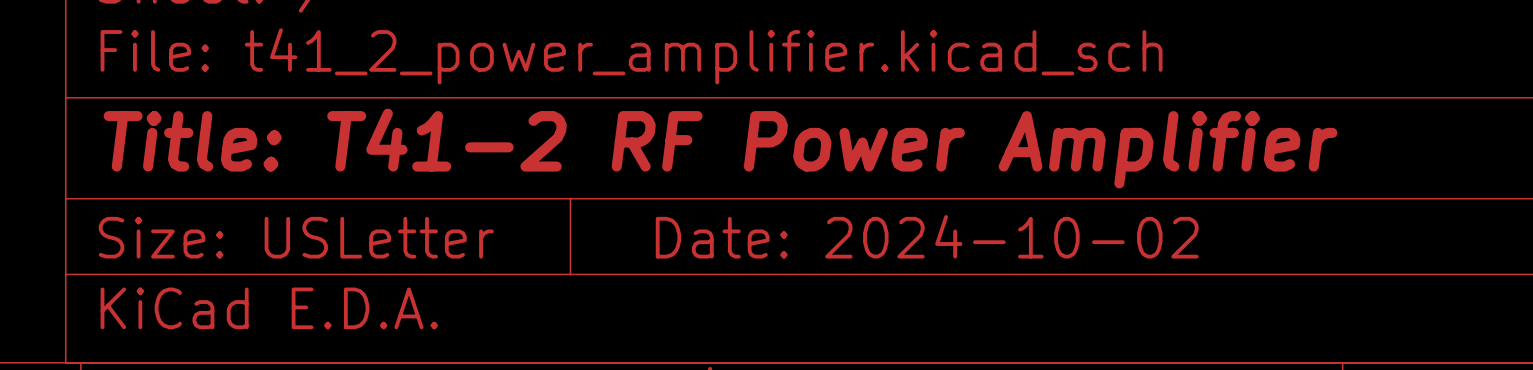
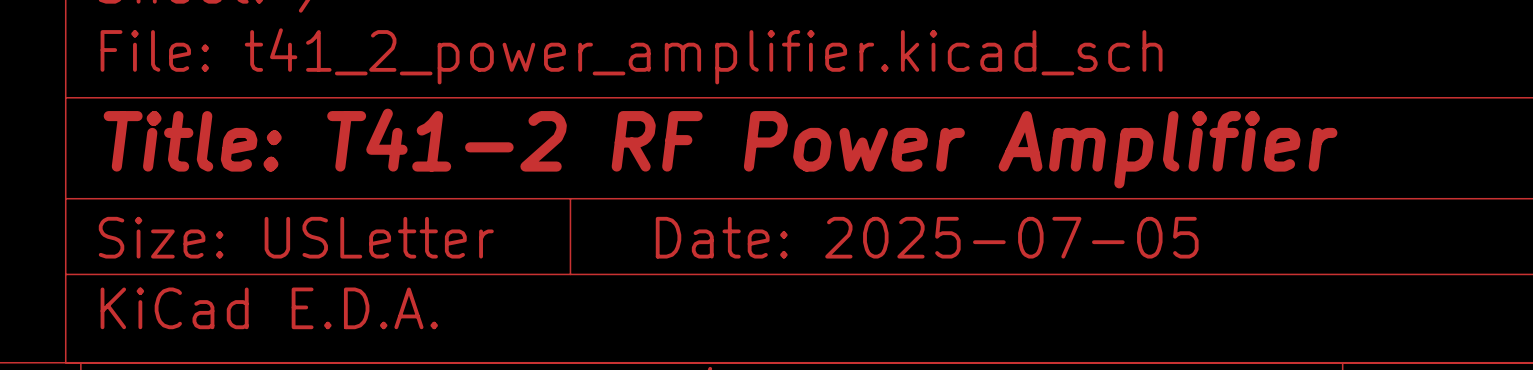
title block: Date: 2024-10-02 (927, 236) -> Date: 2025-07-05 (927, 237)

